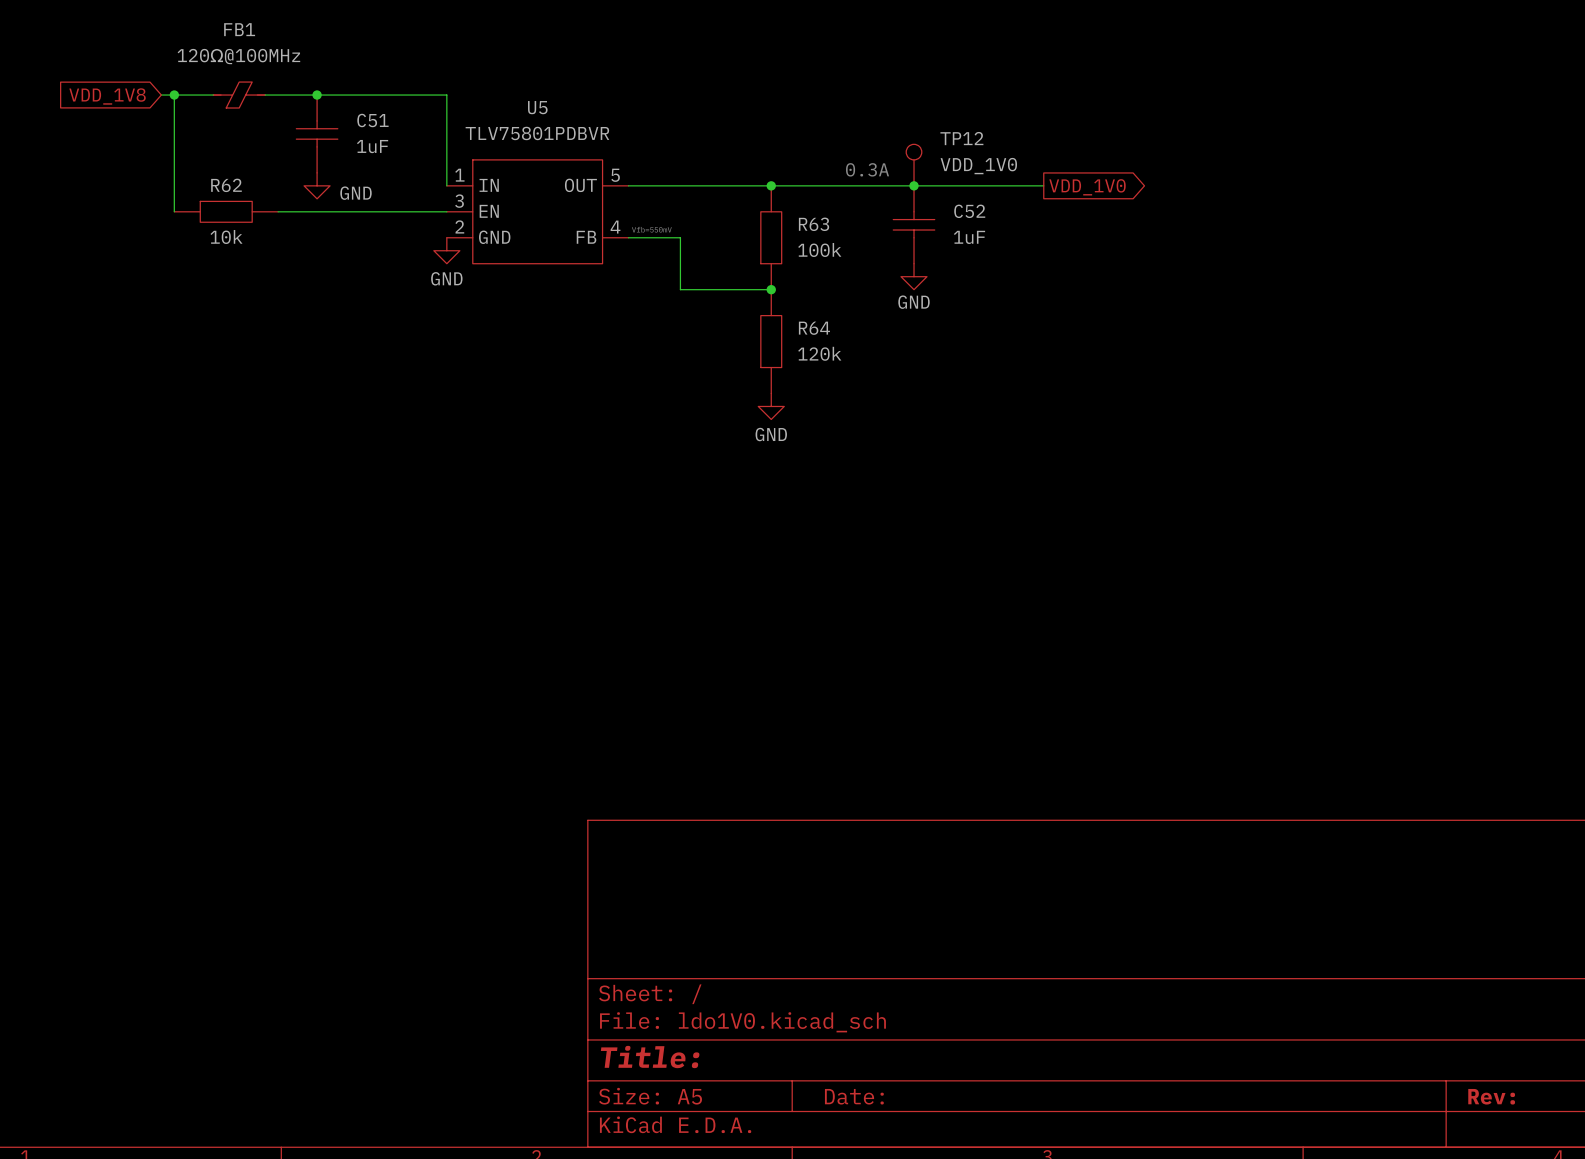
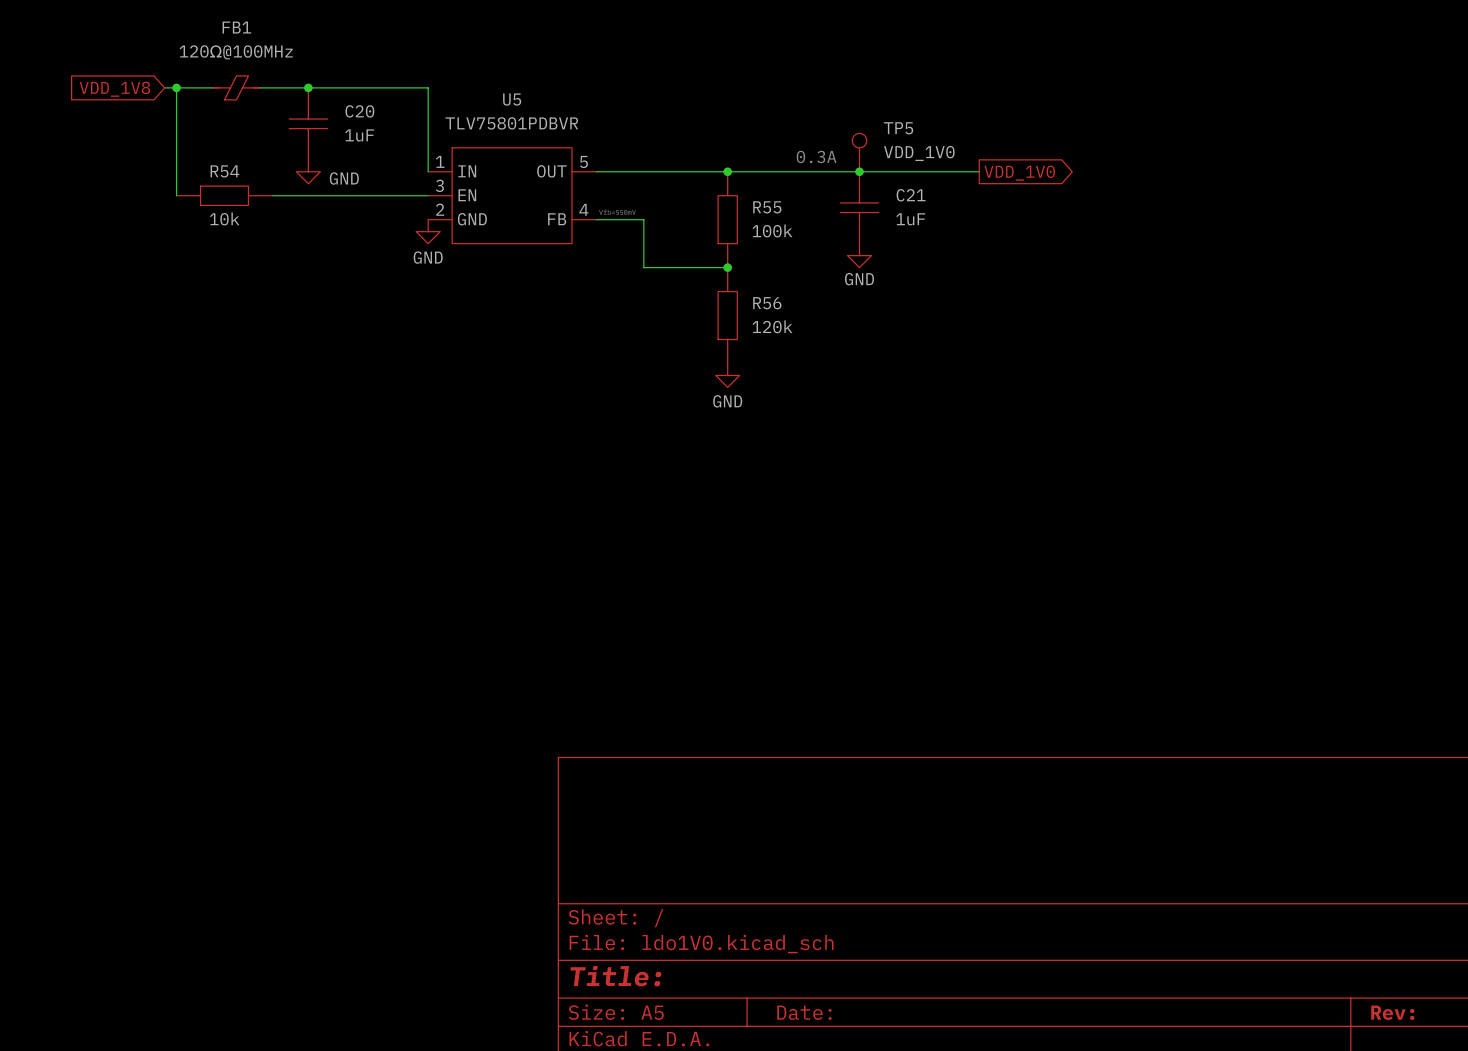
C51 name: C51 (372, 120) -> C20 (359, 111)
TP12 name: TP12 (961, 138) -> TP5 (898, 128)
R62 name: R62 (226, 185) -> R54 (224, 171)
C52 name: C52 (969, 211) -> C21 (911, 195)
R63 name: R63 (814, 224) -> R55 (767, 207)
R64 name: R64 (814, 328) -> R56 (767, 303)

